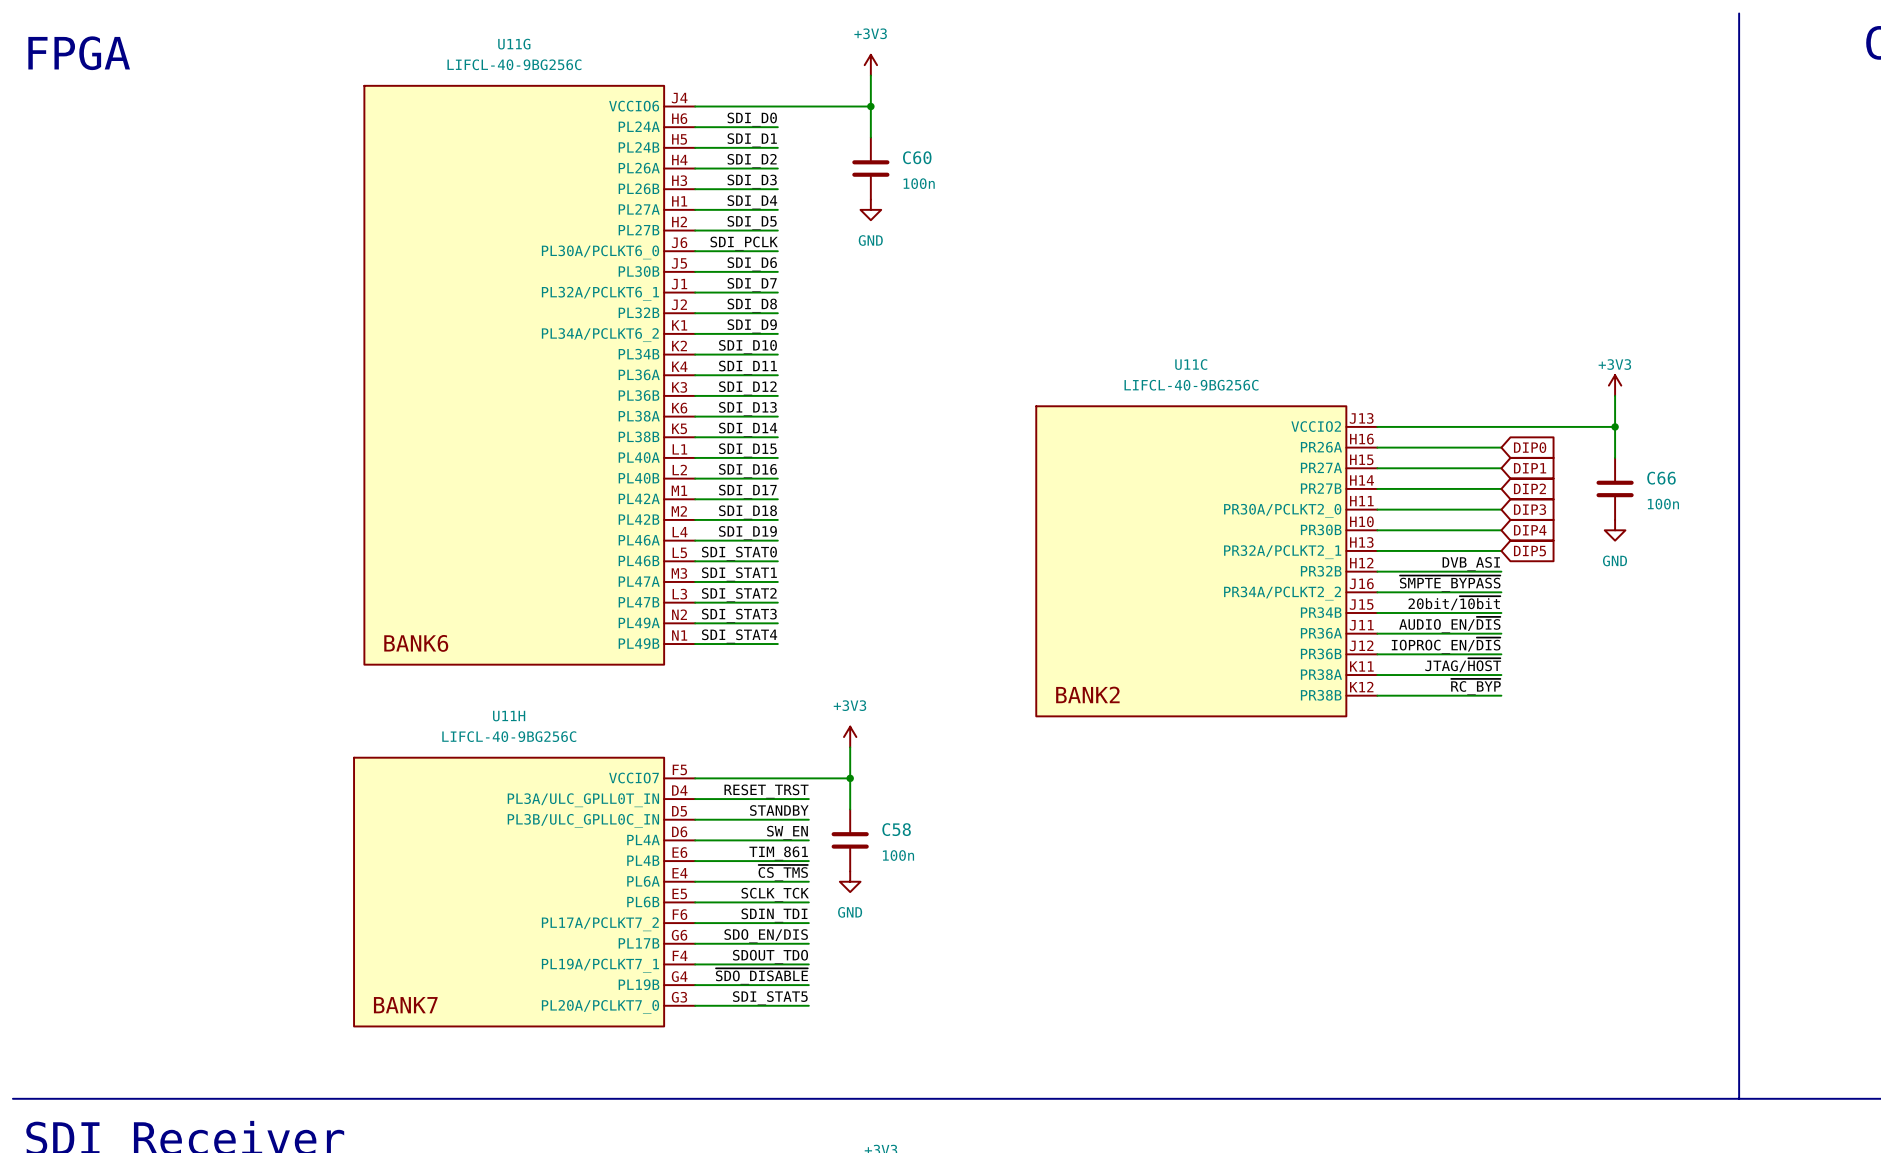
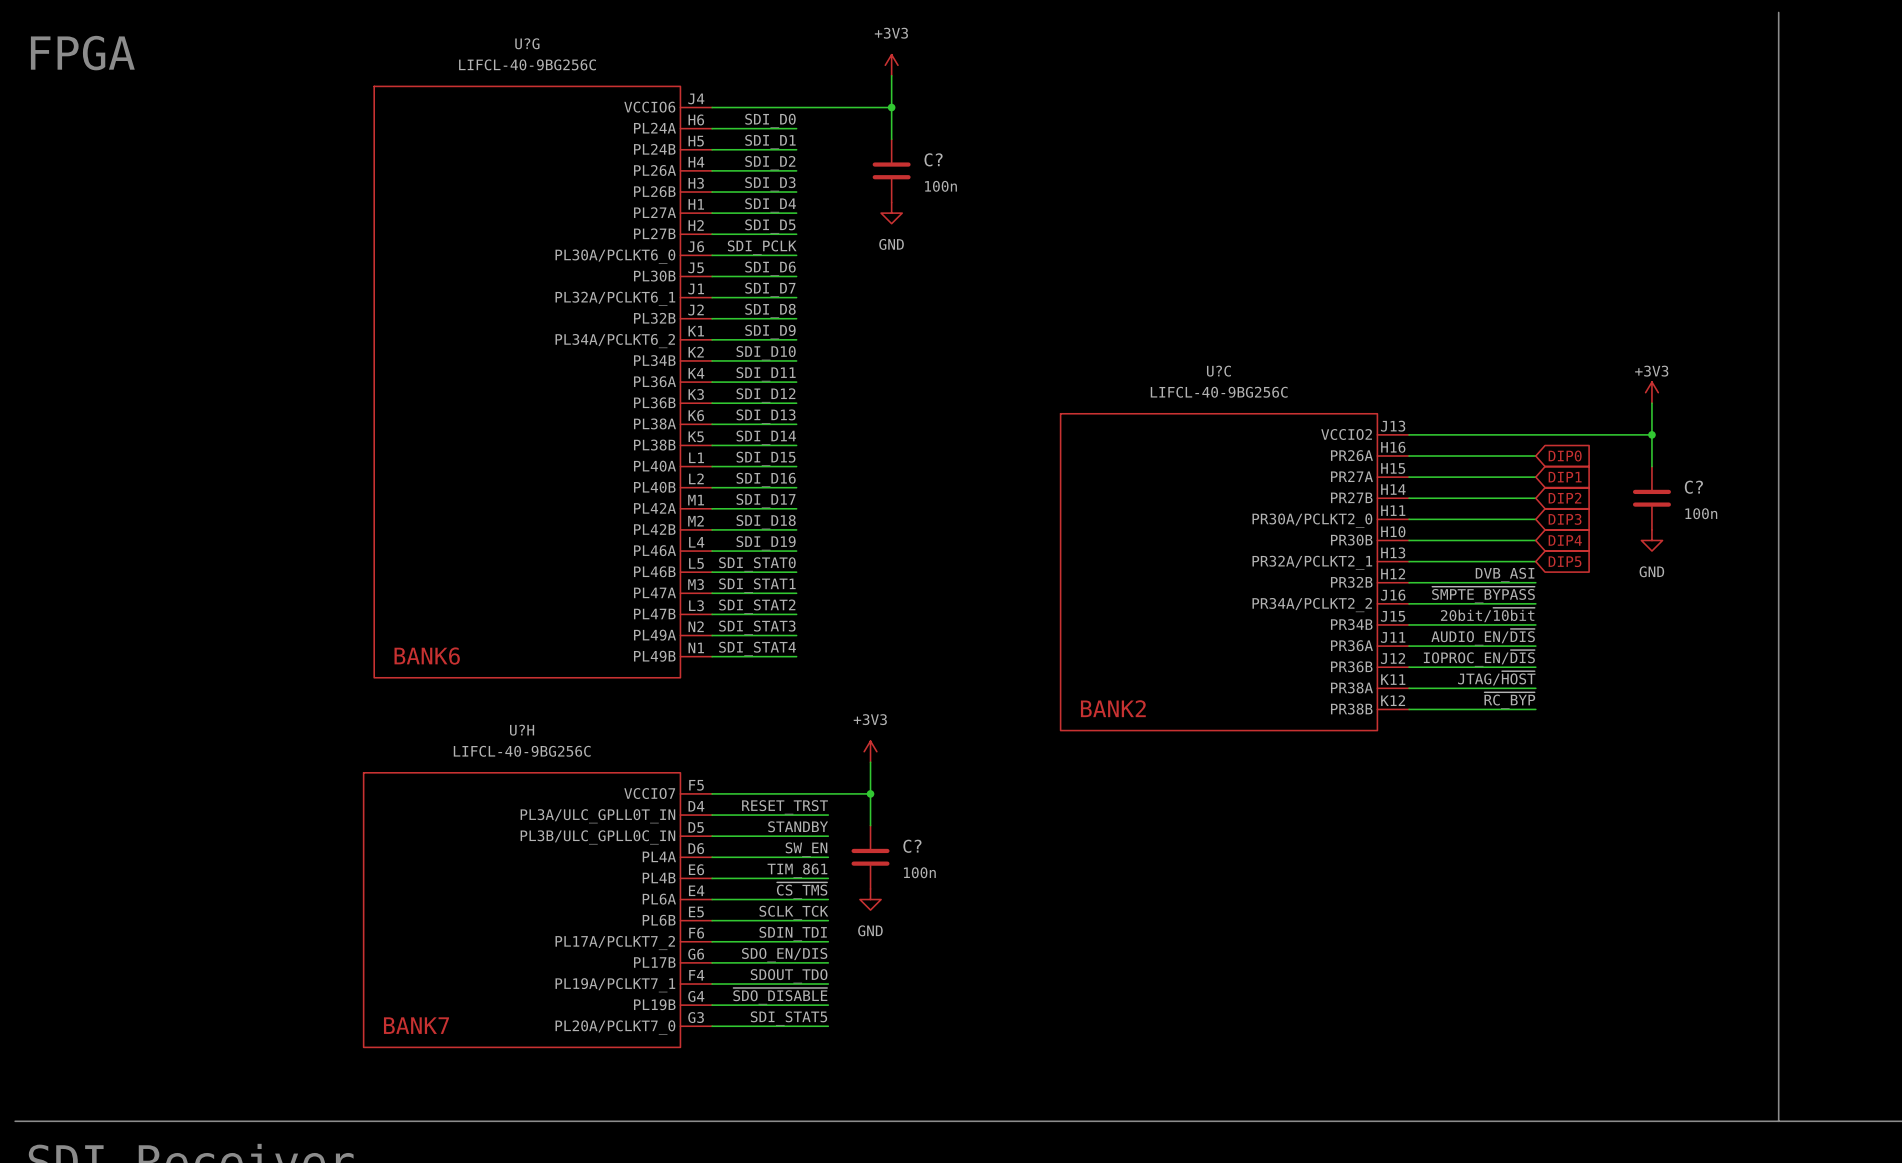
U11G name: U11G (514, 44) -> U?G (527, 43)
C60 name: C60 (917, 157) -> C? (933, 159)
U11C name: U11C (1191, 364) -> U?C (1218, 371)
C66 name: C66 (1661, 478) -> C? (1693, 487)
U11H name: U11H (509, 716) -> U?H (522, 730)
C58 name: C58 (896, 829) -> C? (912, 846)

